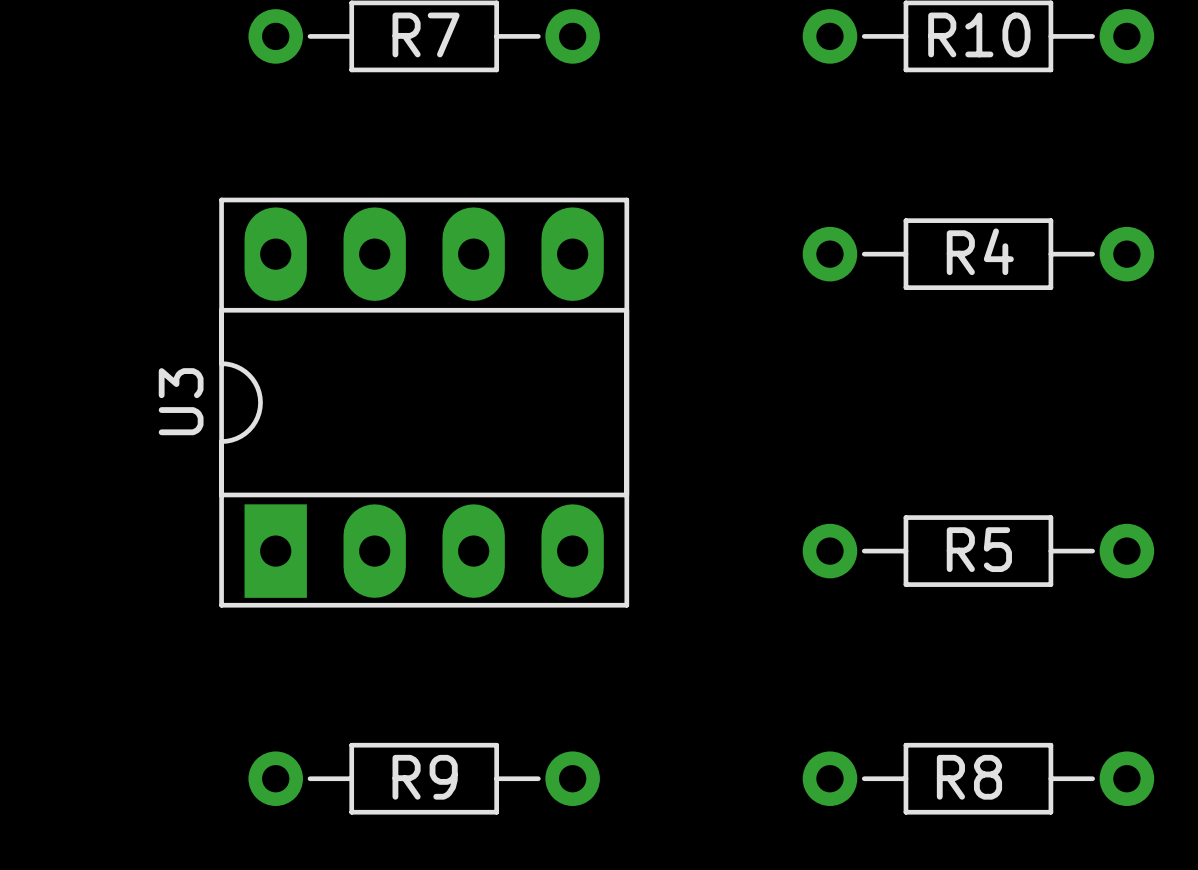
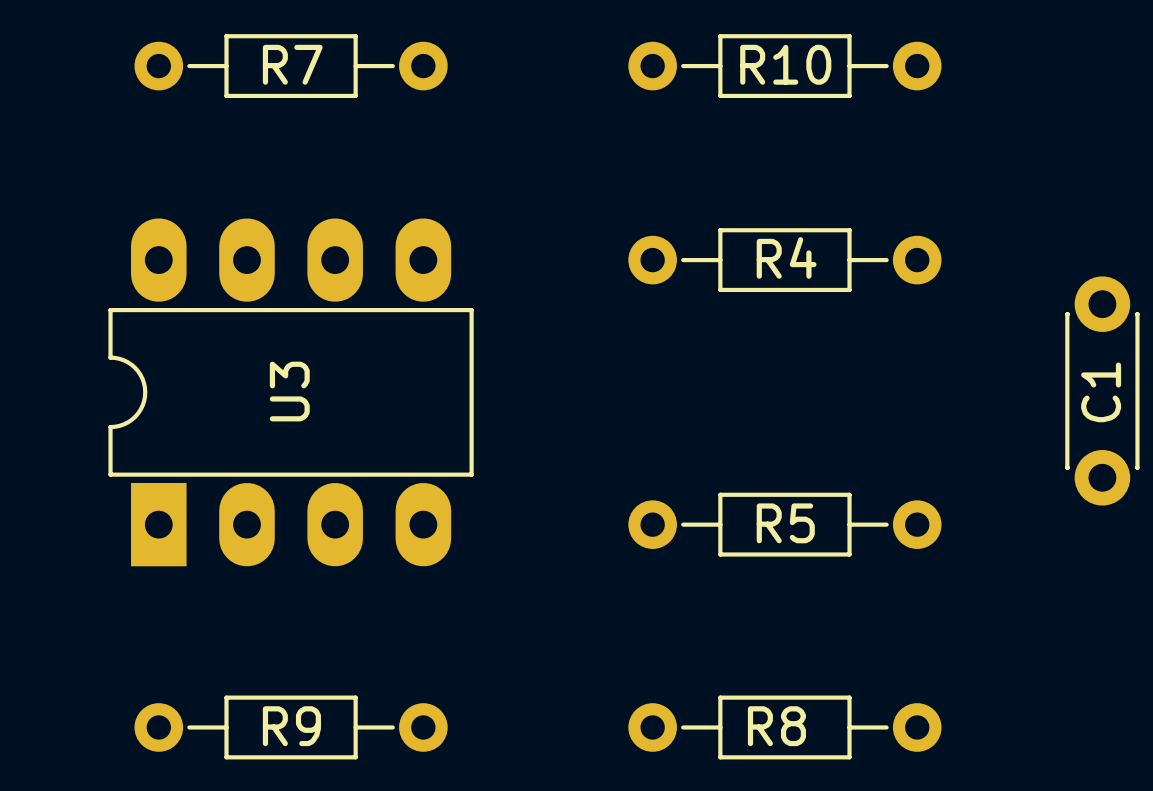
U3 footprint: [219, 197, 630, 608] -> [108, 218, 474, 567]
U3 name position: U3 (181, 401) -> U3 (289, 391)

